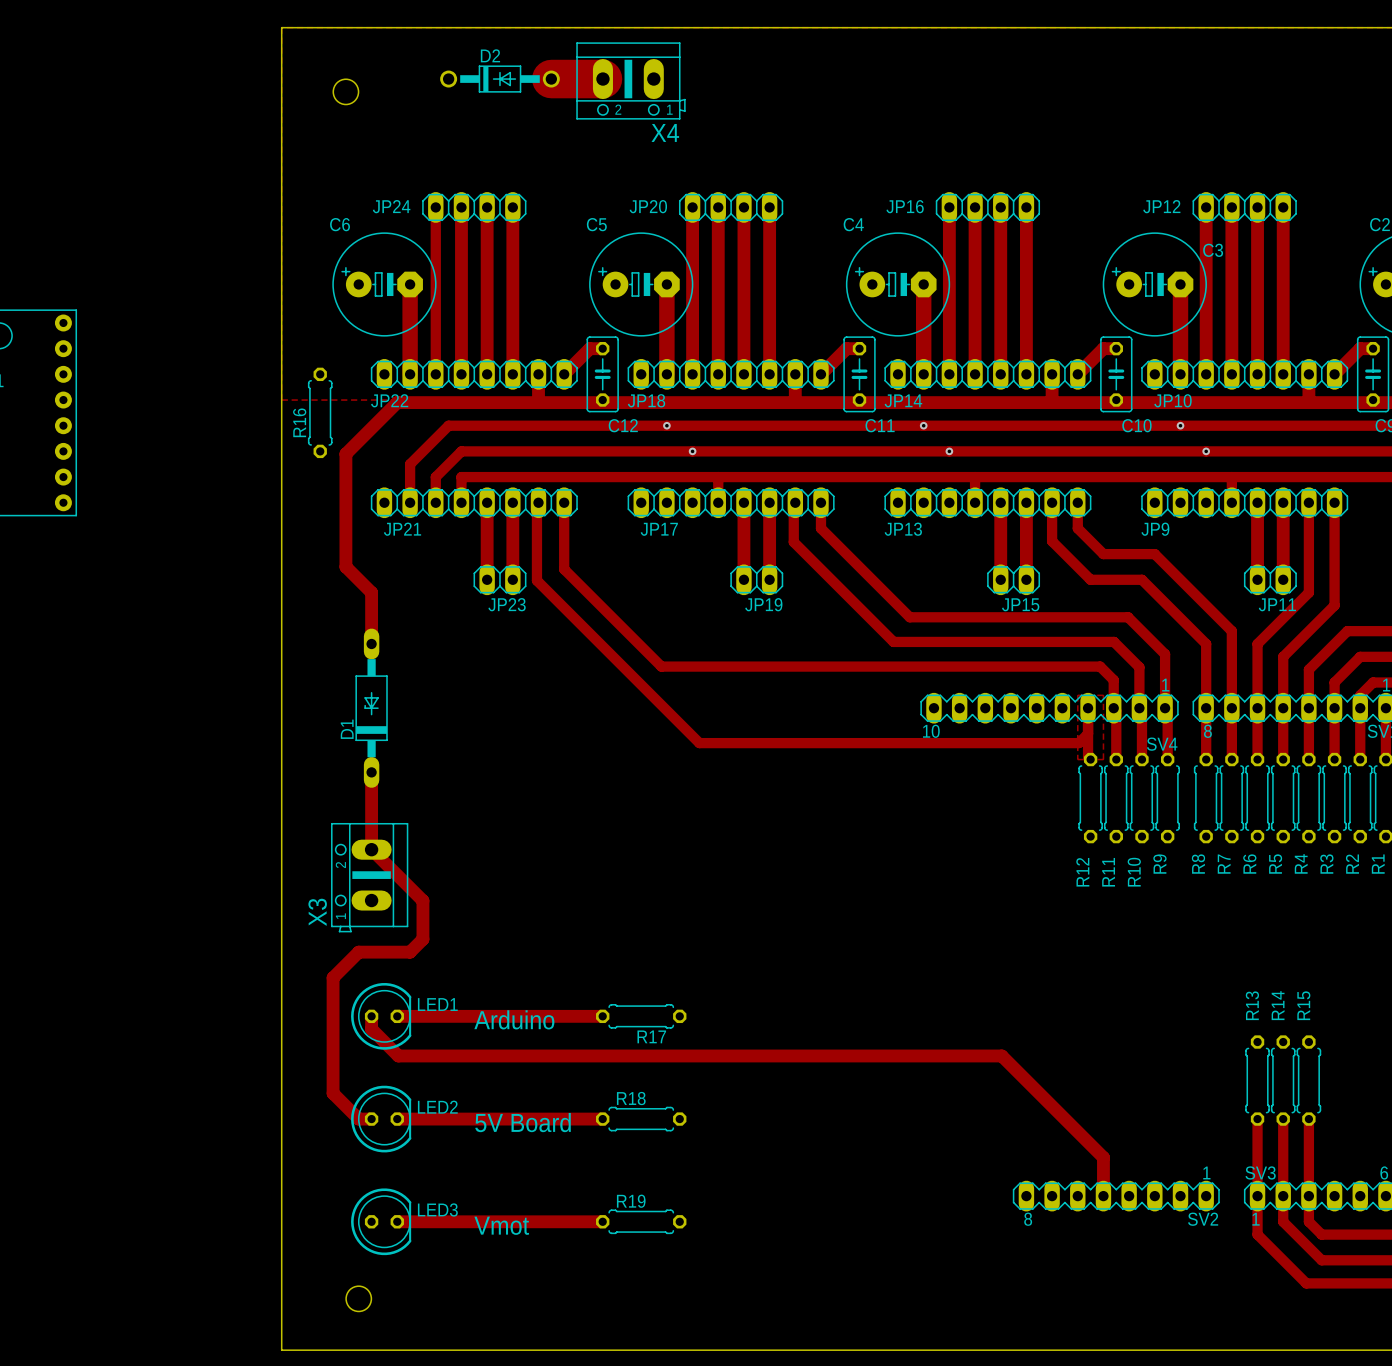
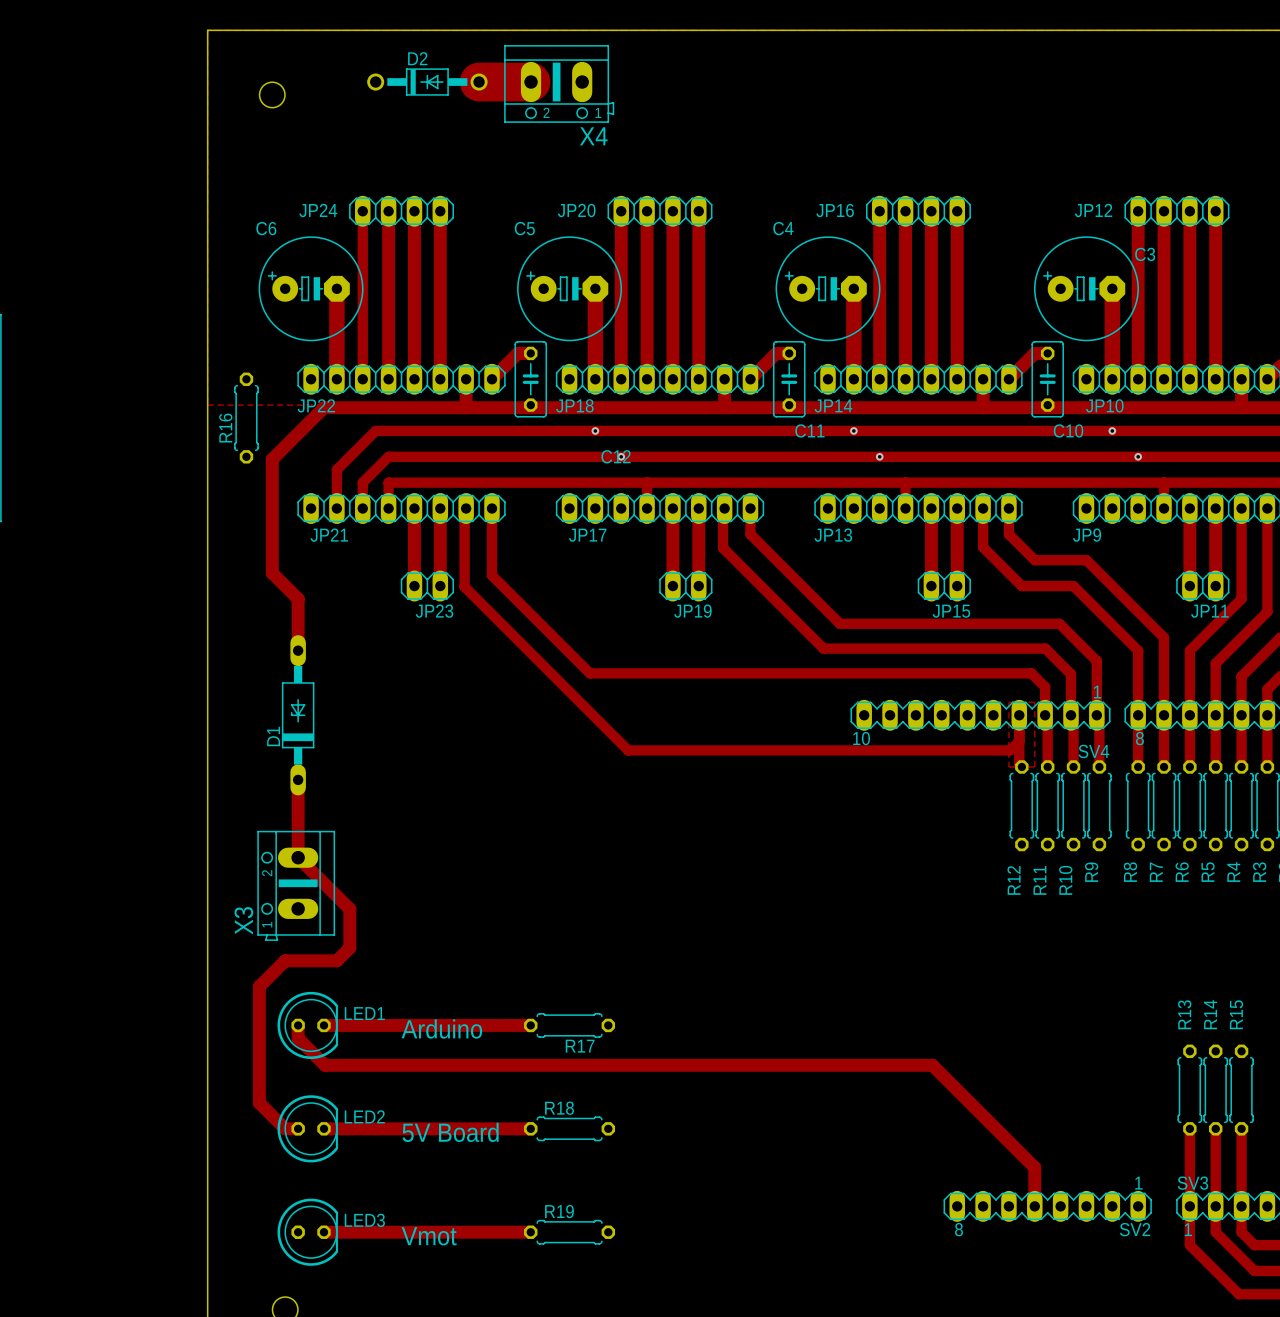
C12 name position: C12 (623, 425) -> C12 (616, 456)

